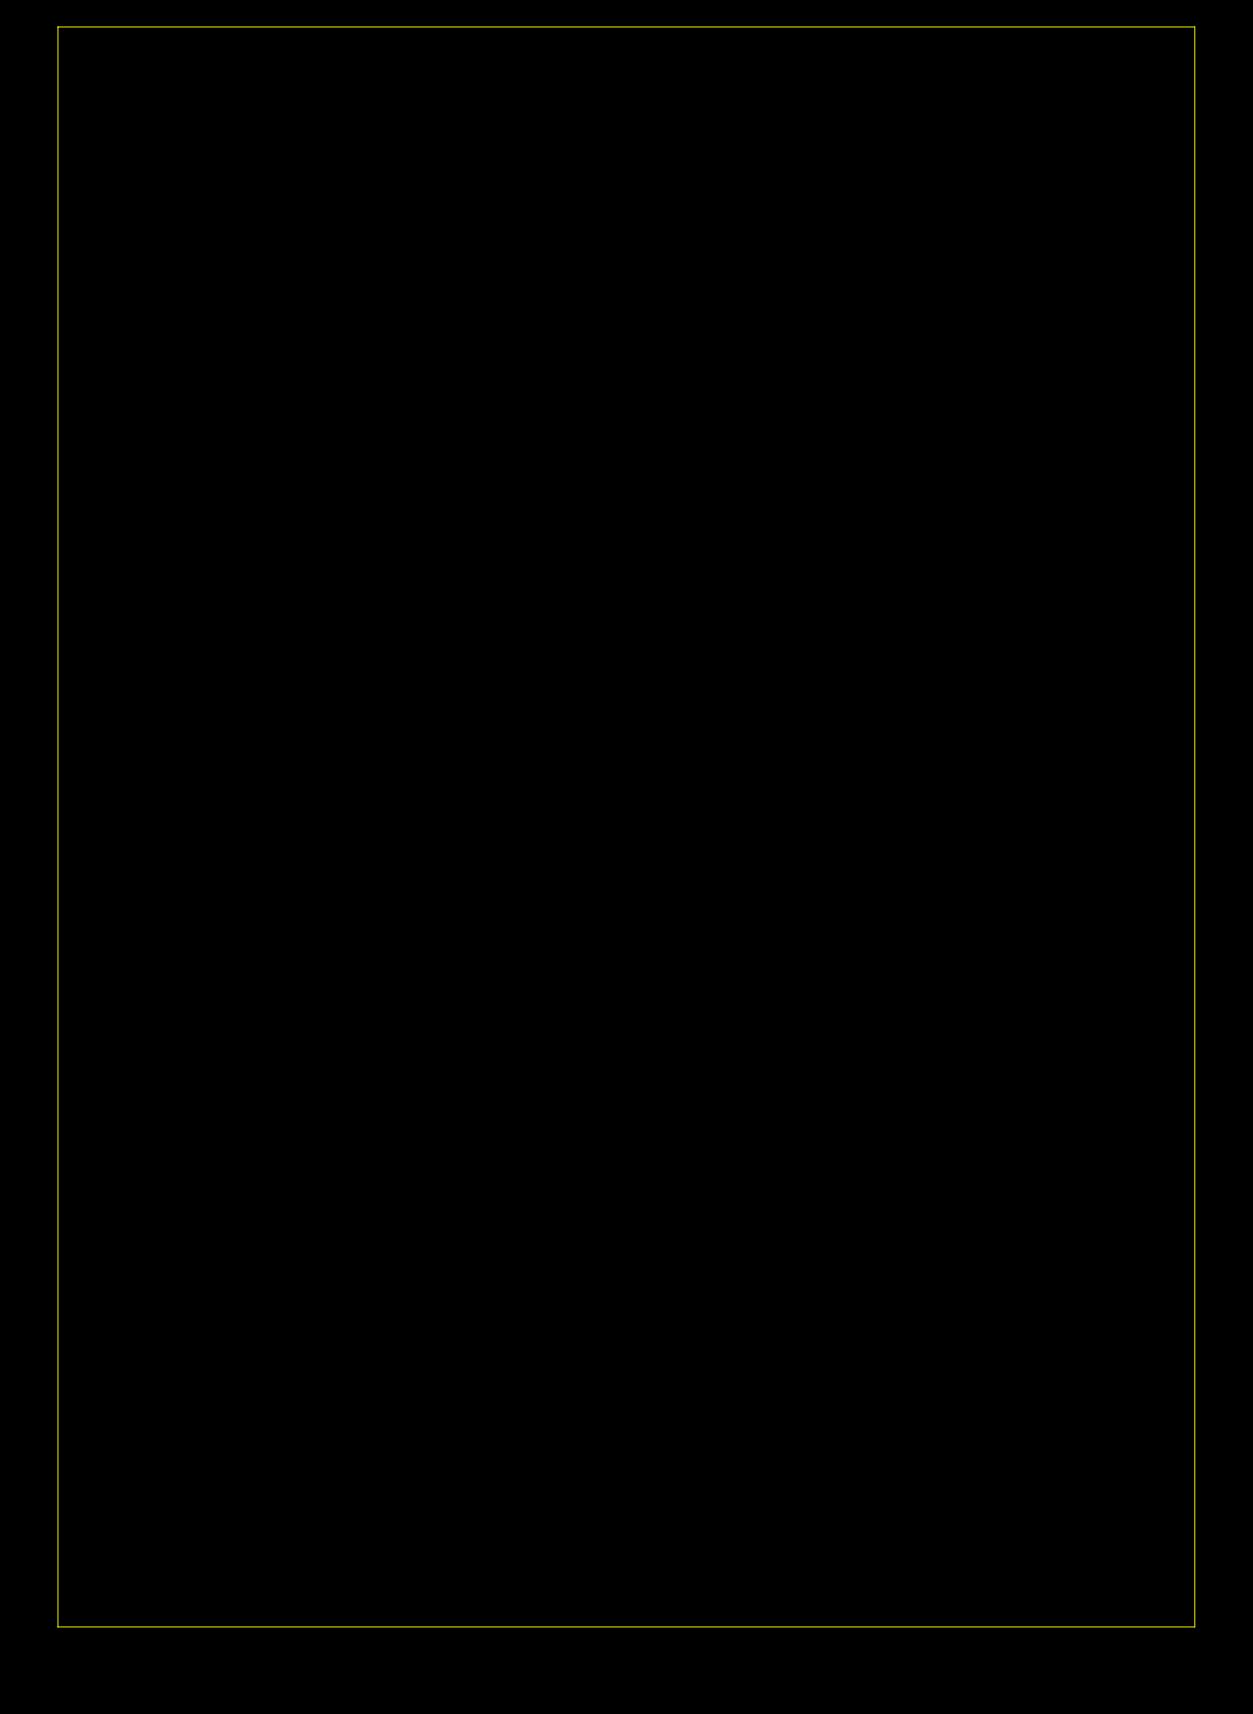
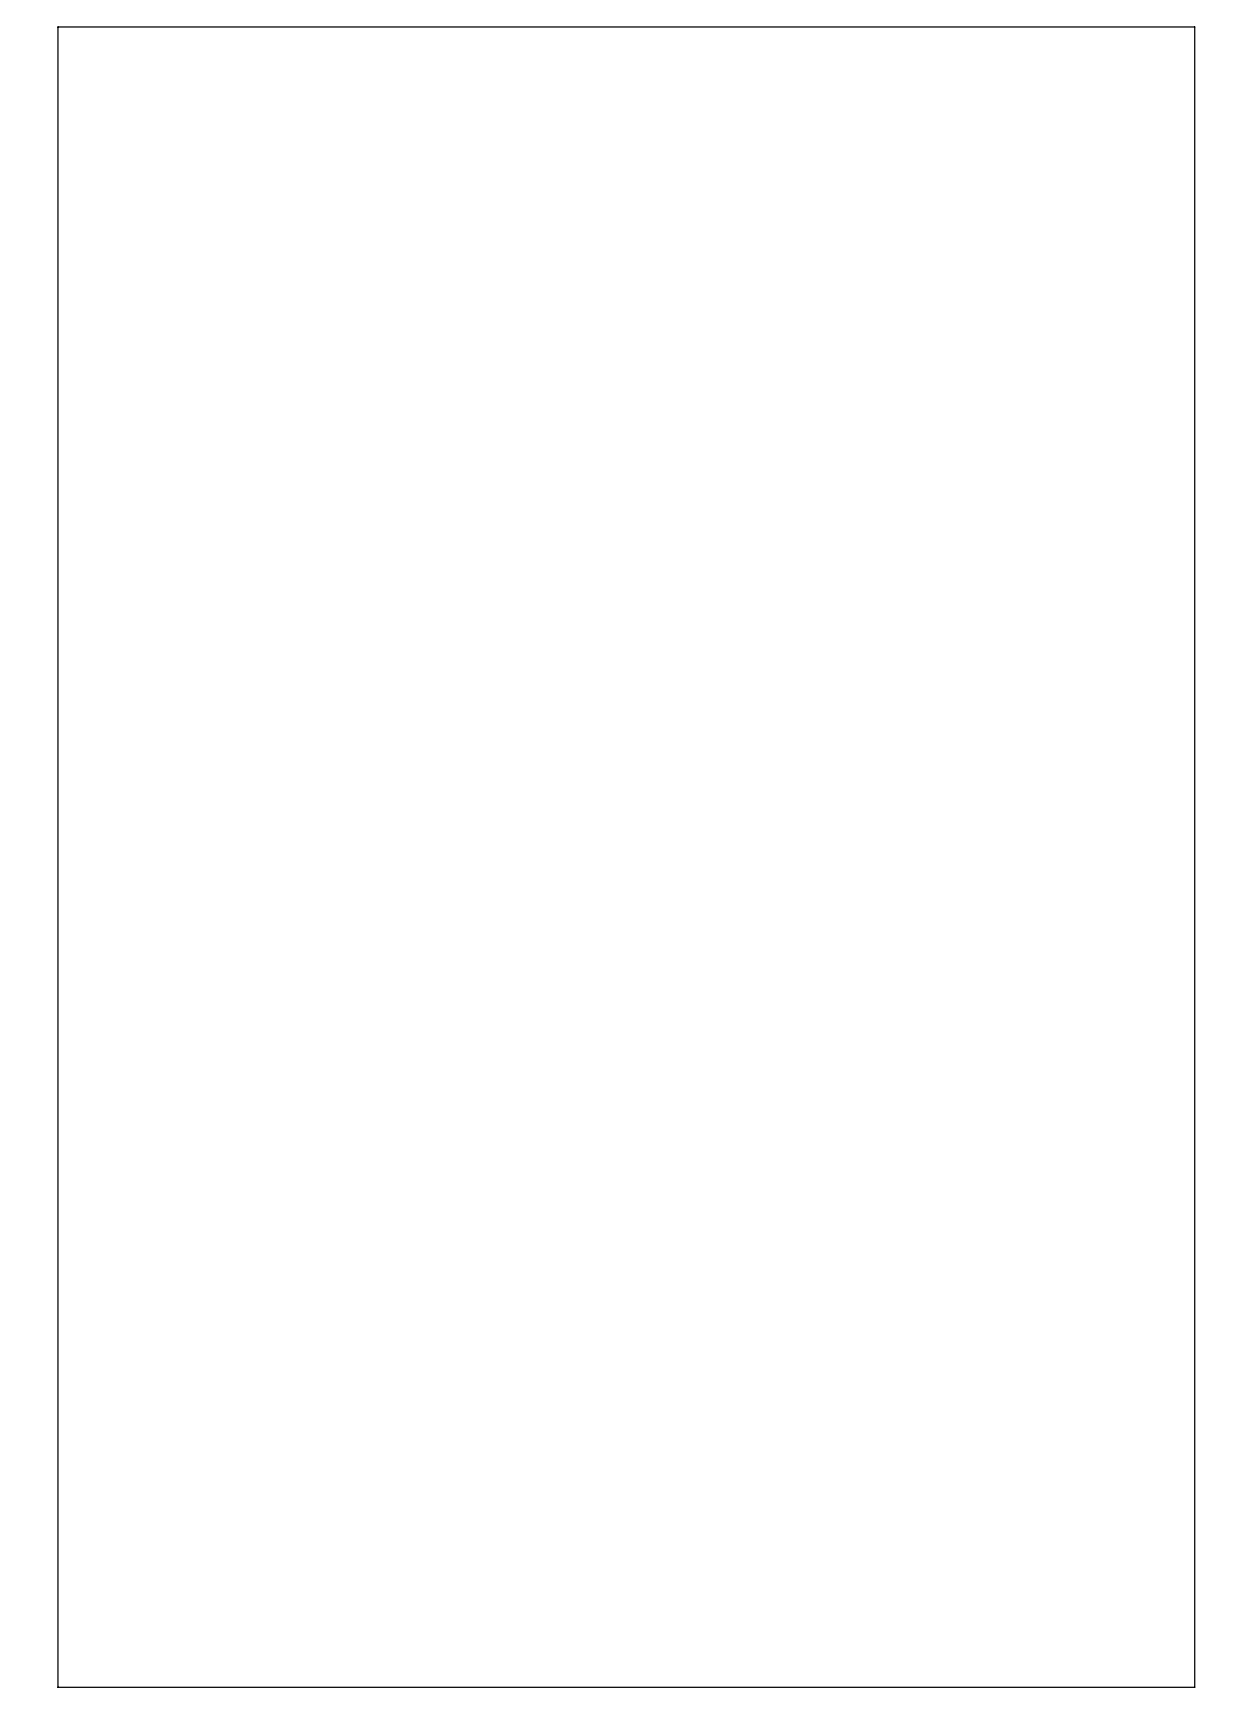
board edge: (57, 1626) (1194, 1626) -> (57, 1626) (57, 1687) (1194, 1687) (1194, 1626)

